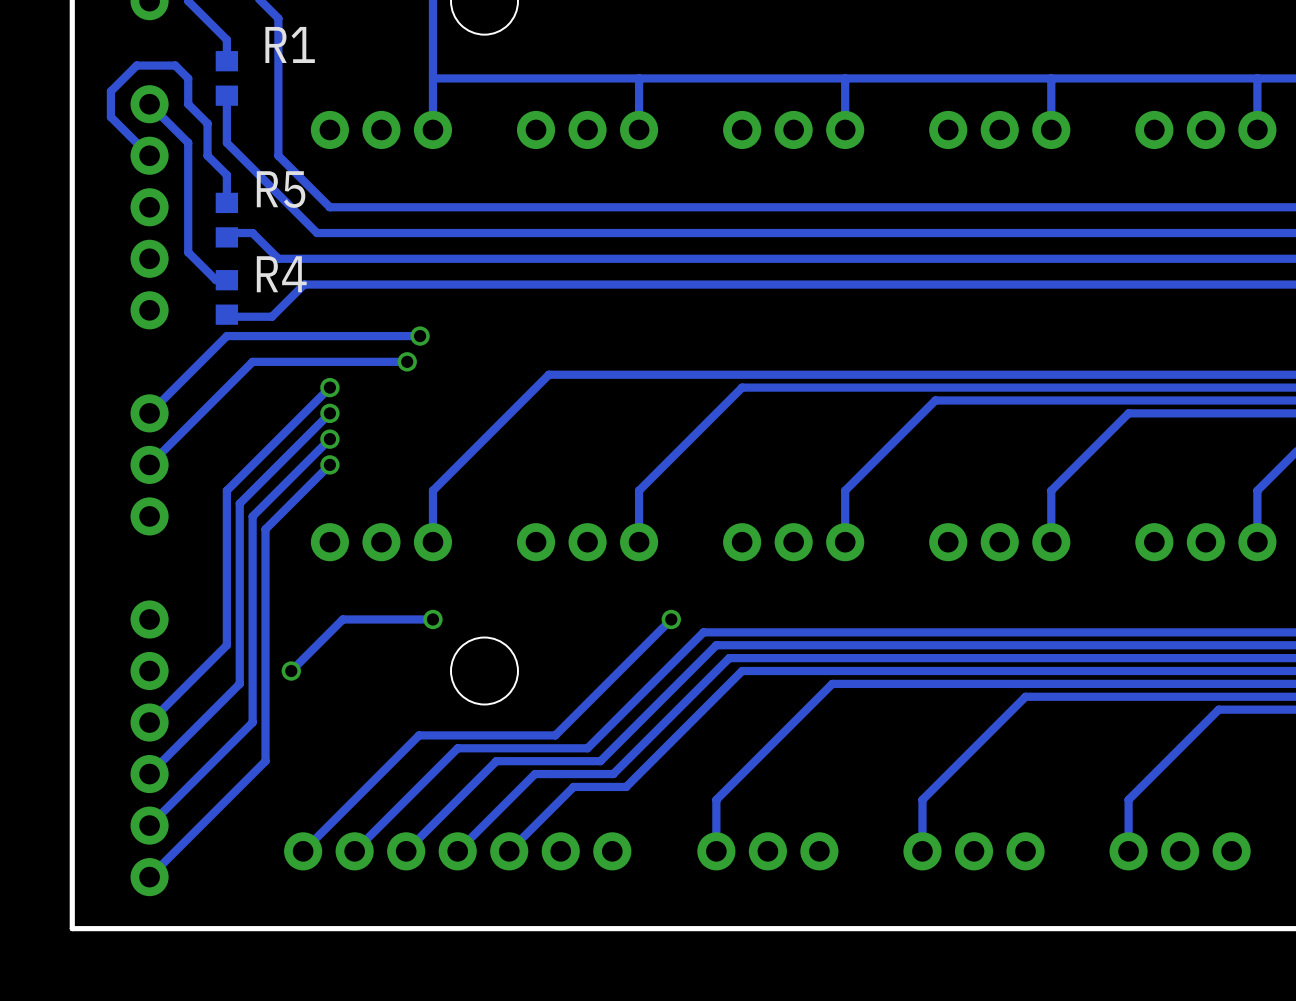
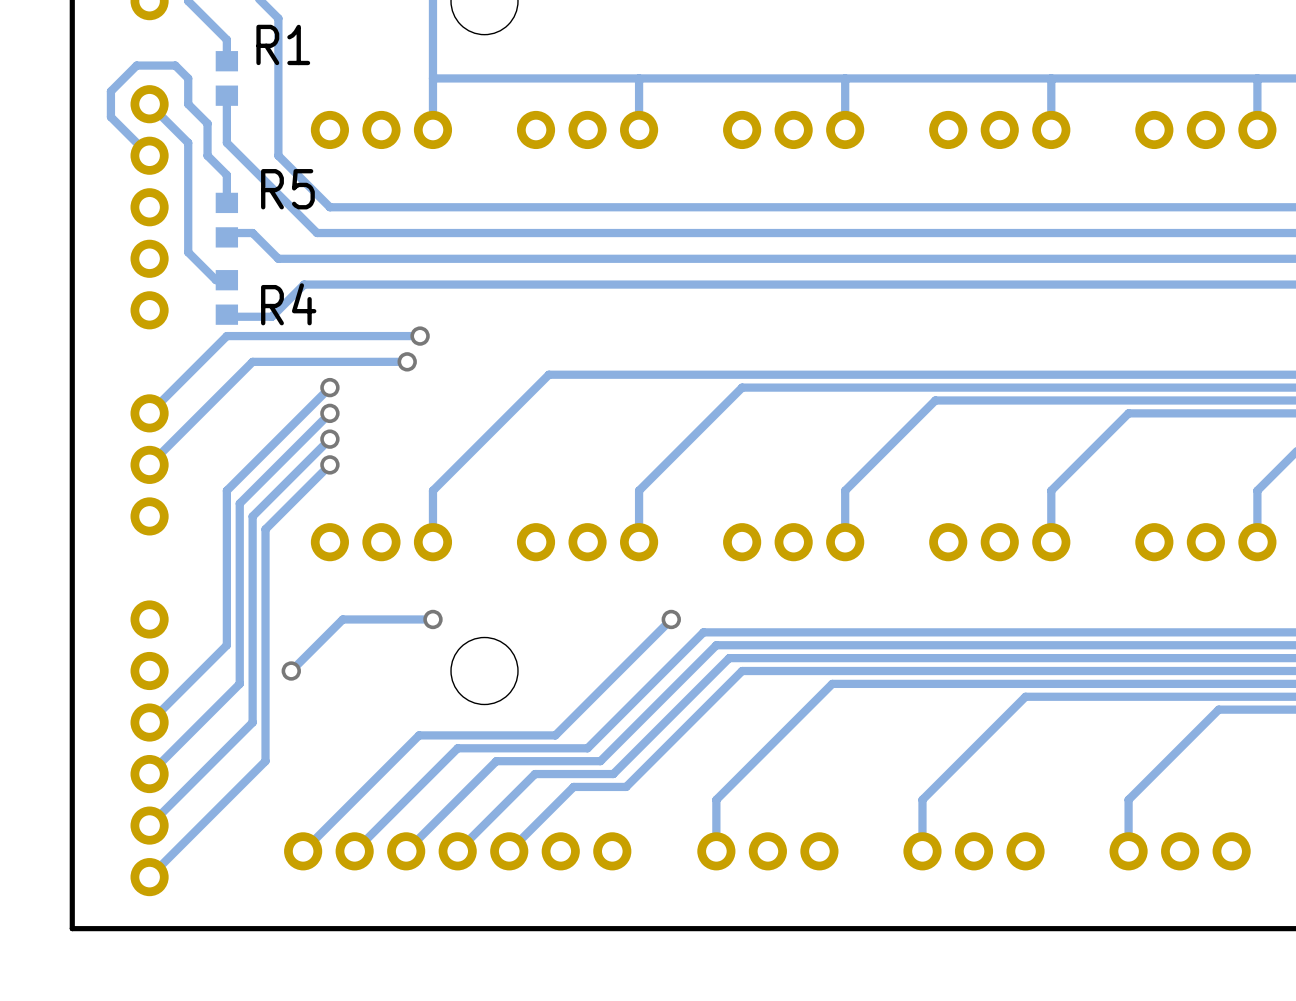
R4 name position: R4 (281, 274) -> R4 (288, 304)

